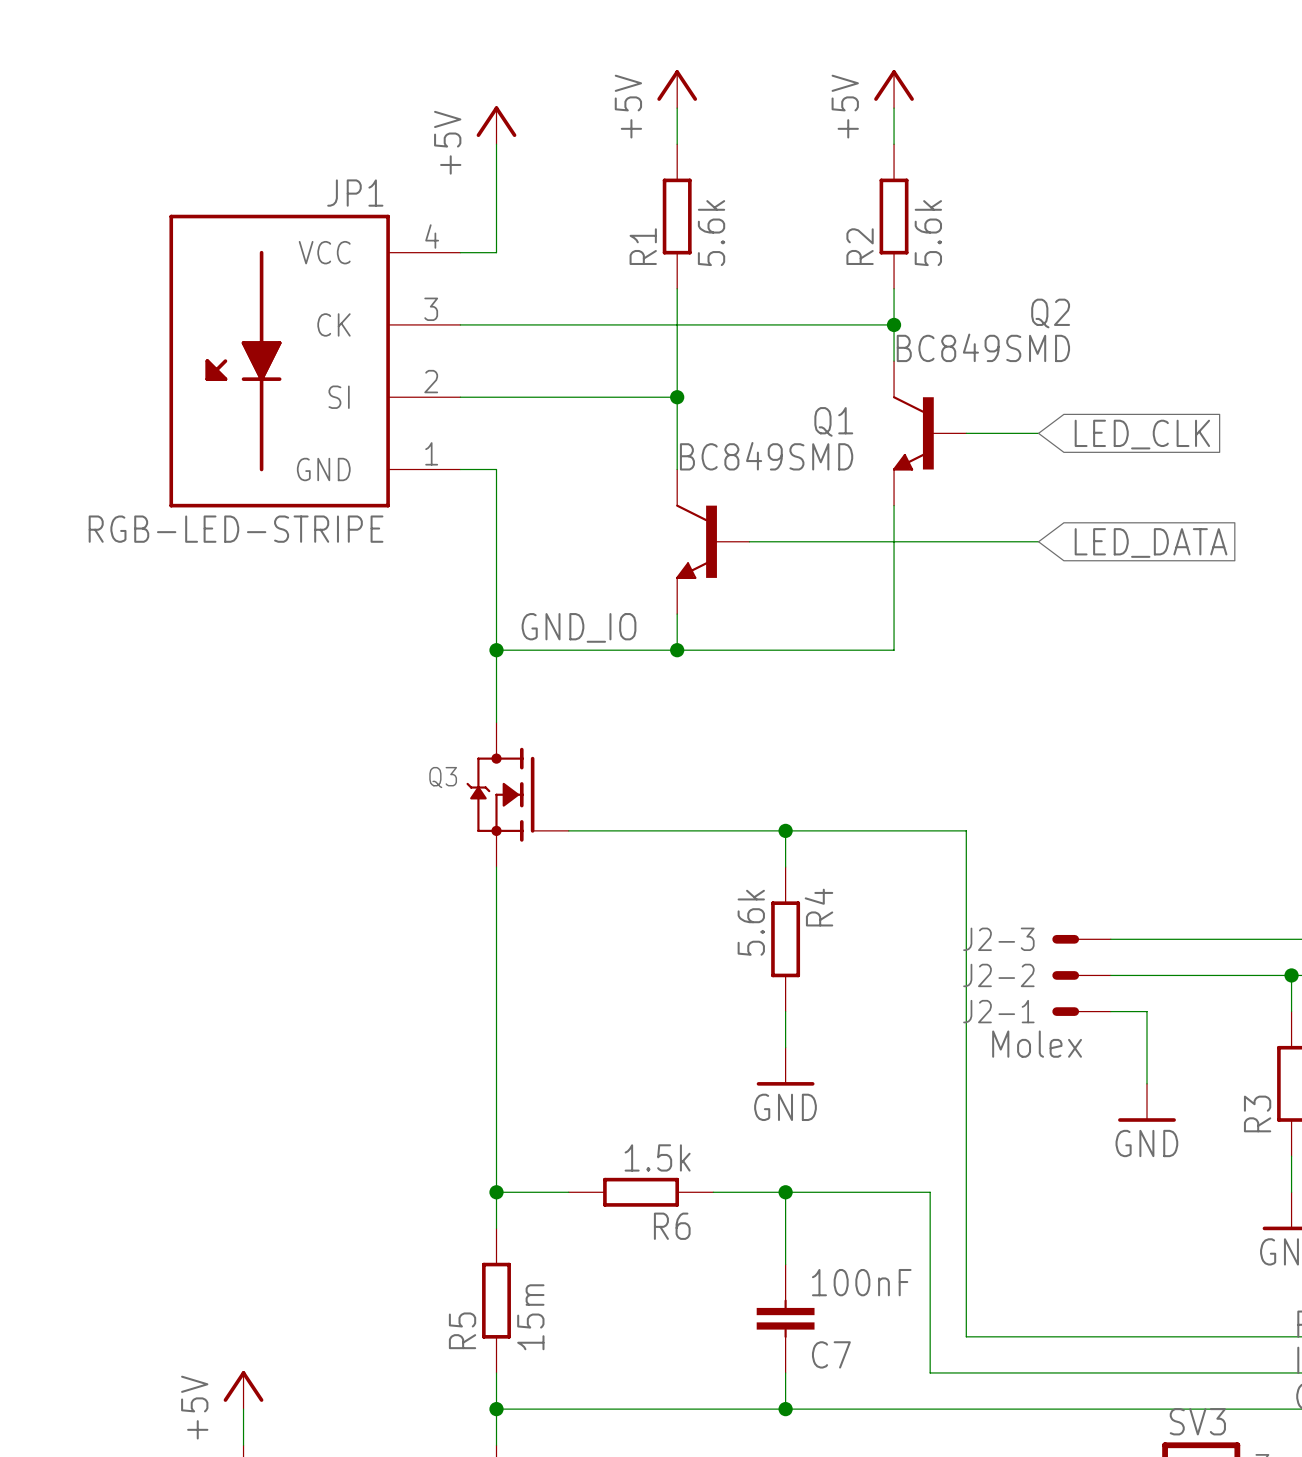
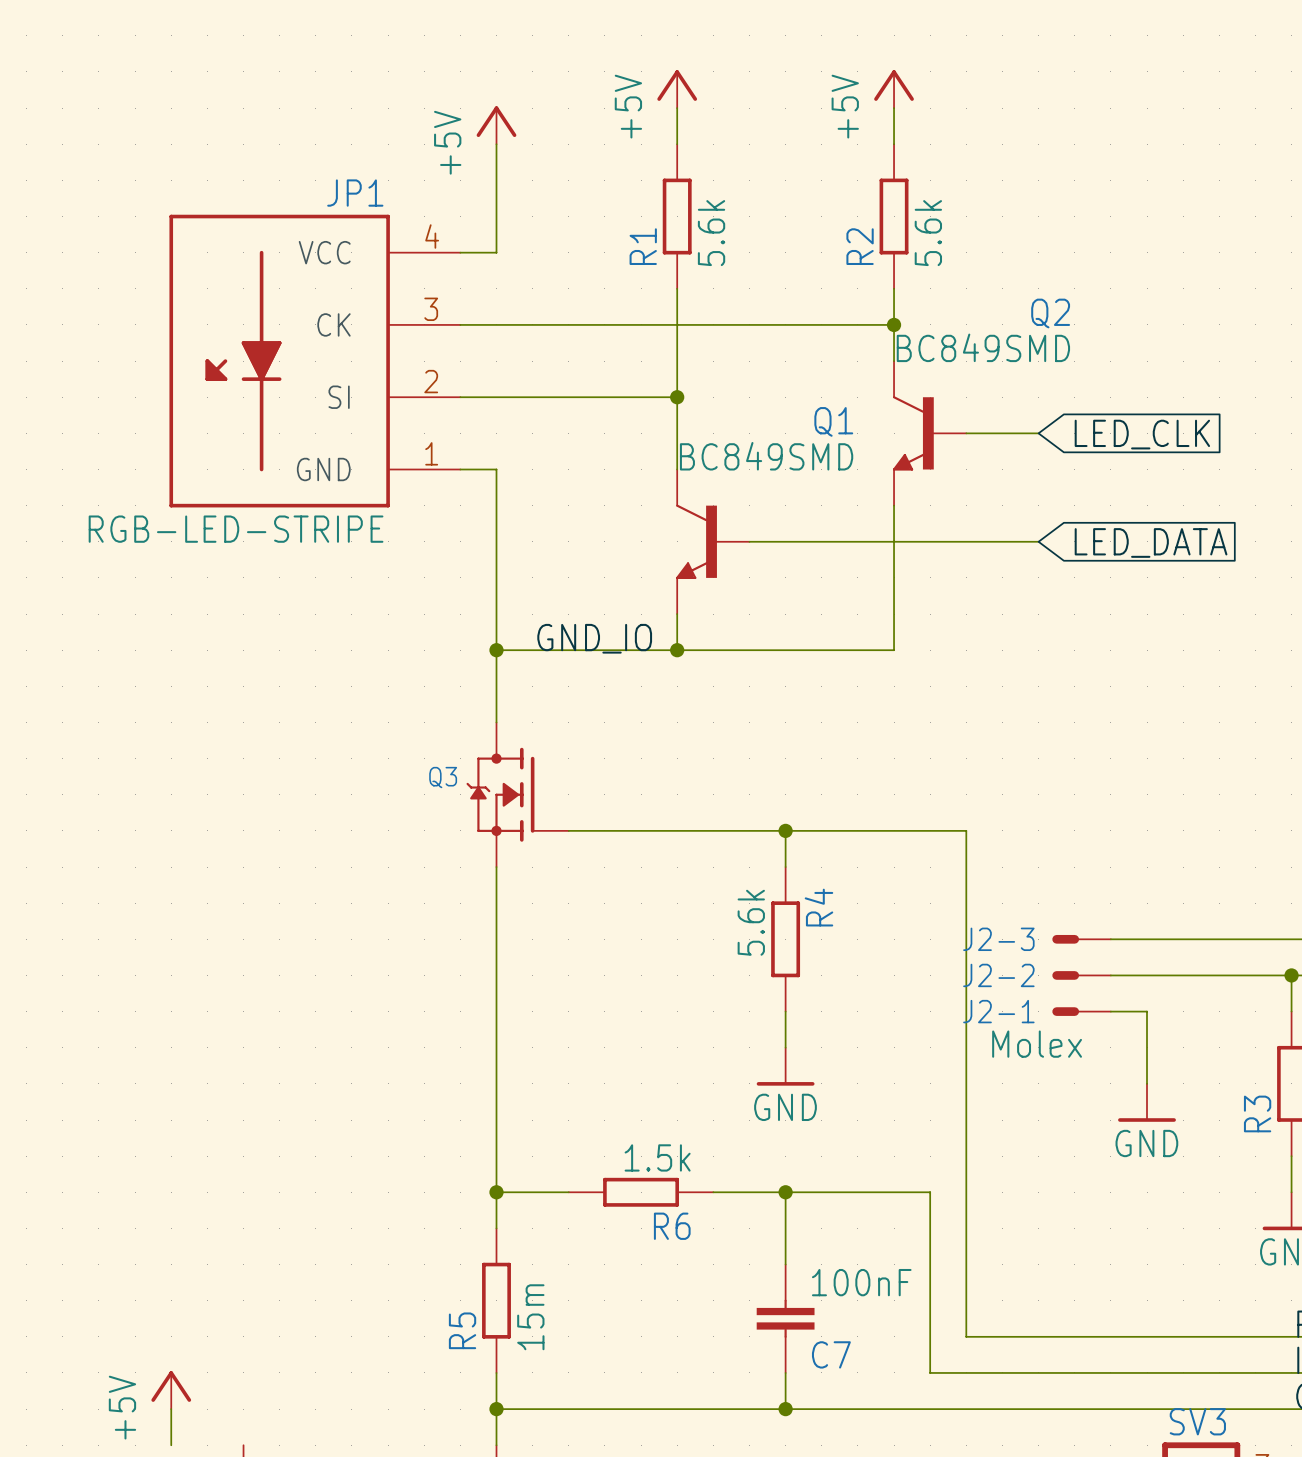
label position: GND_IO (579, 627) -> GND_IO (594, 638)
power symbol position: +5V (243, 1390) -> +5V (171, 1390)
wire: (243, 1409) (243, 1445) -> (171, 1409) (171, 1445)

